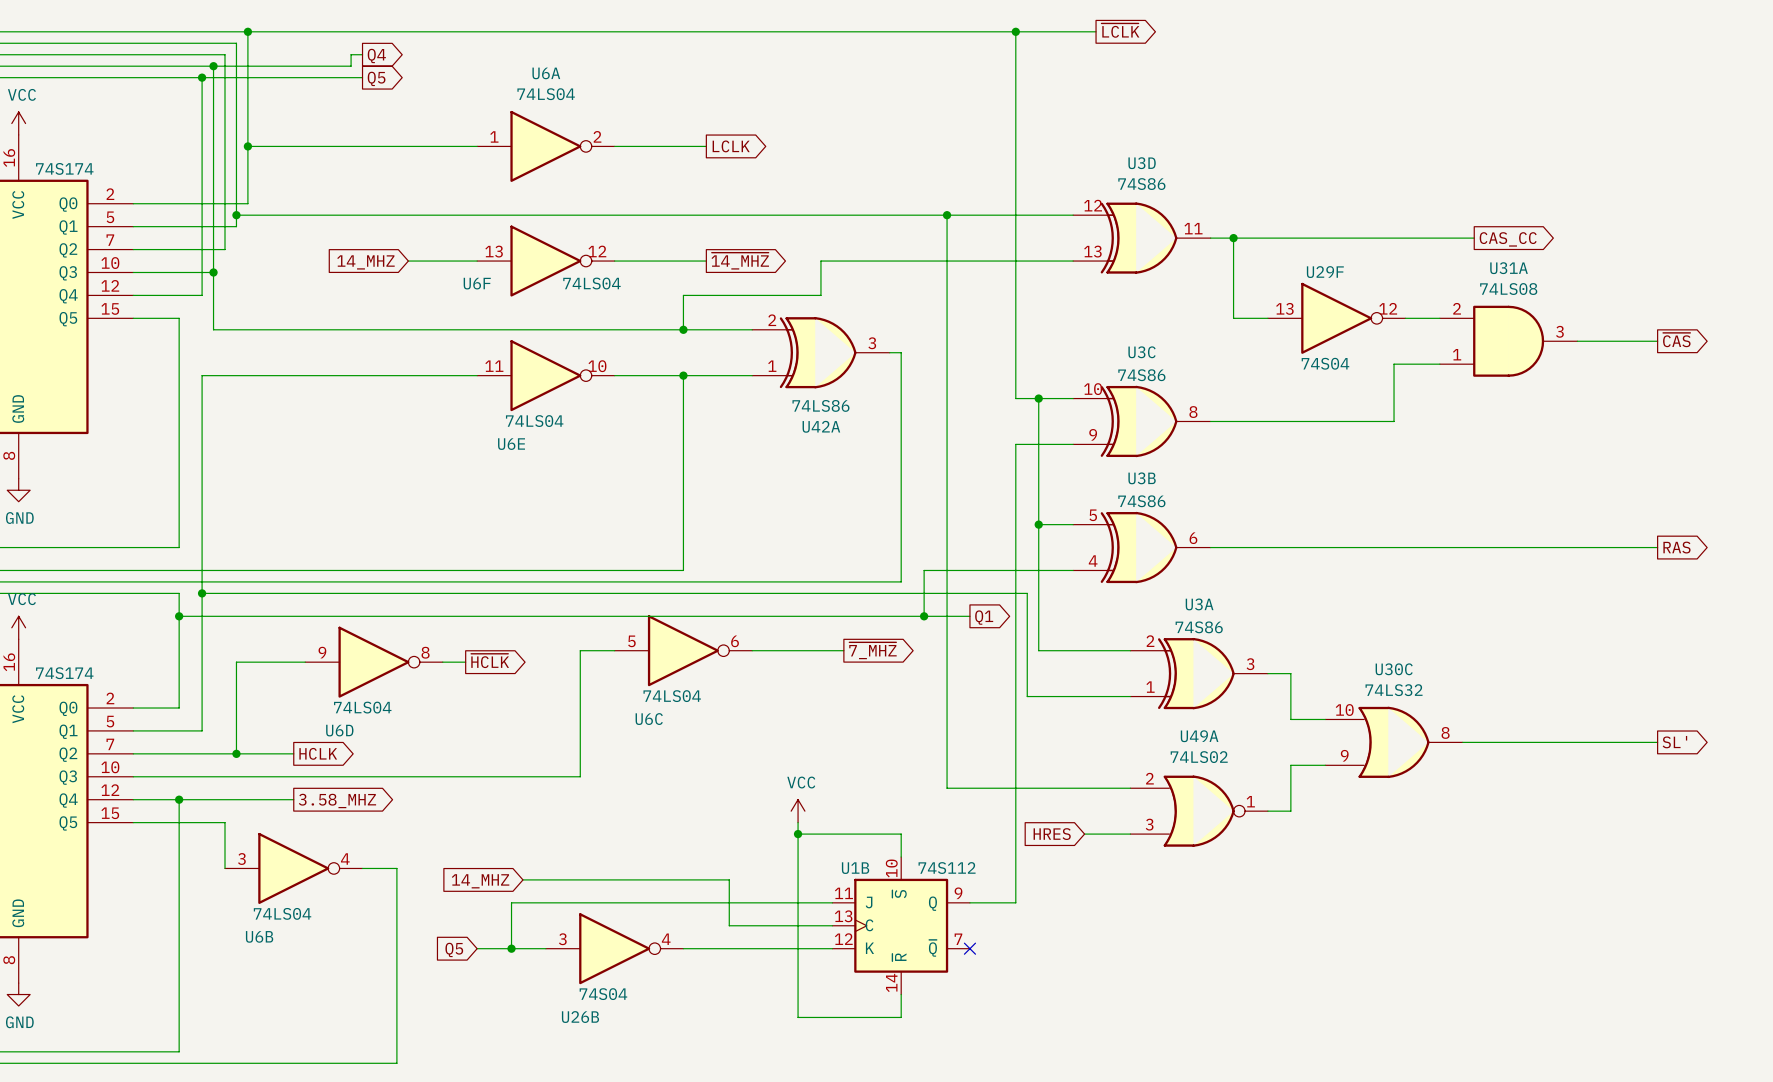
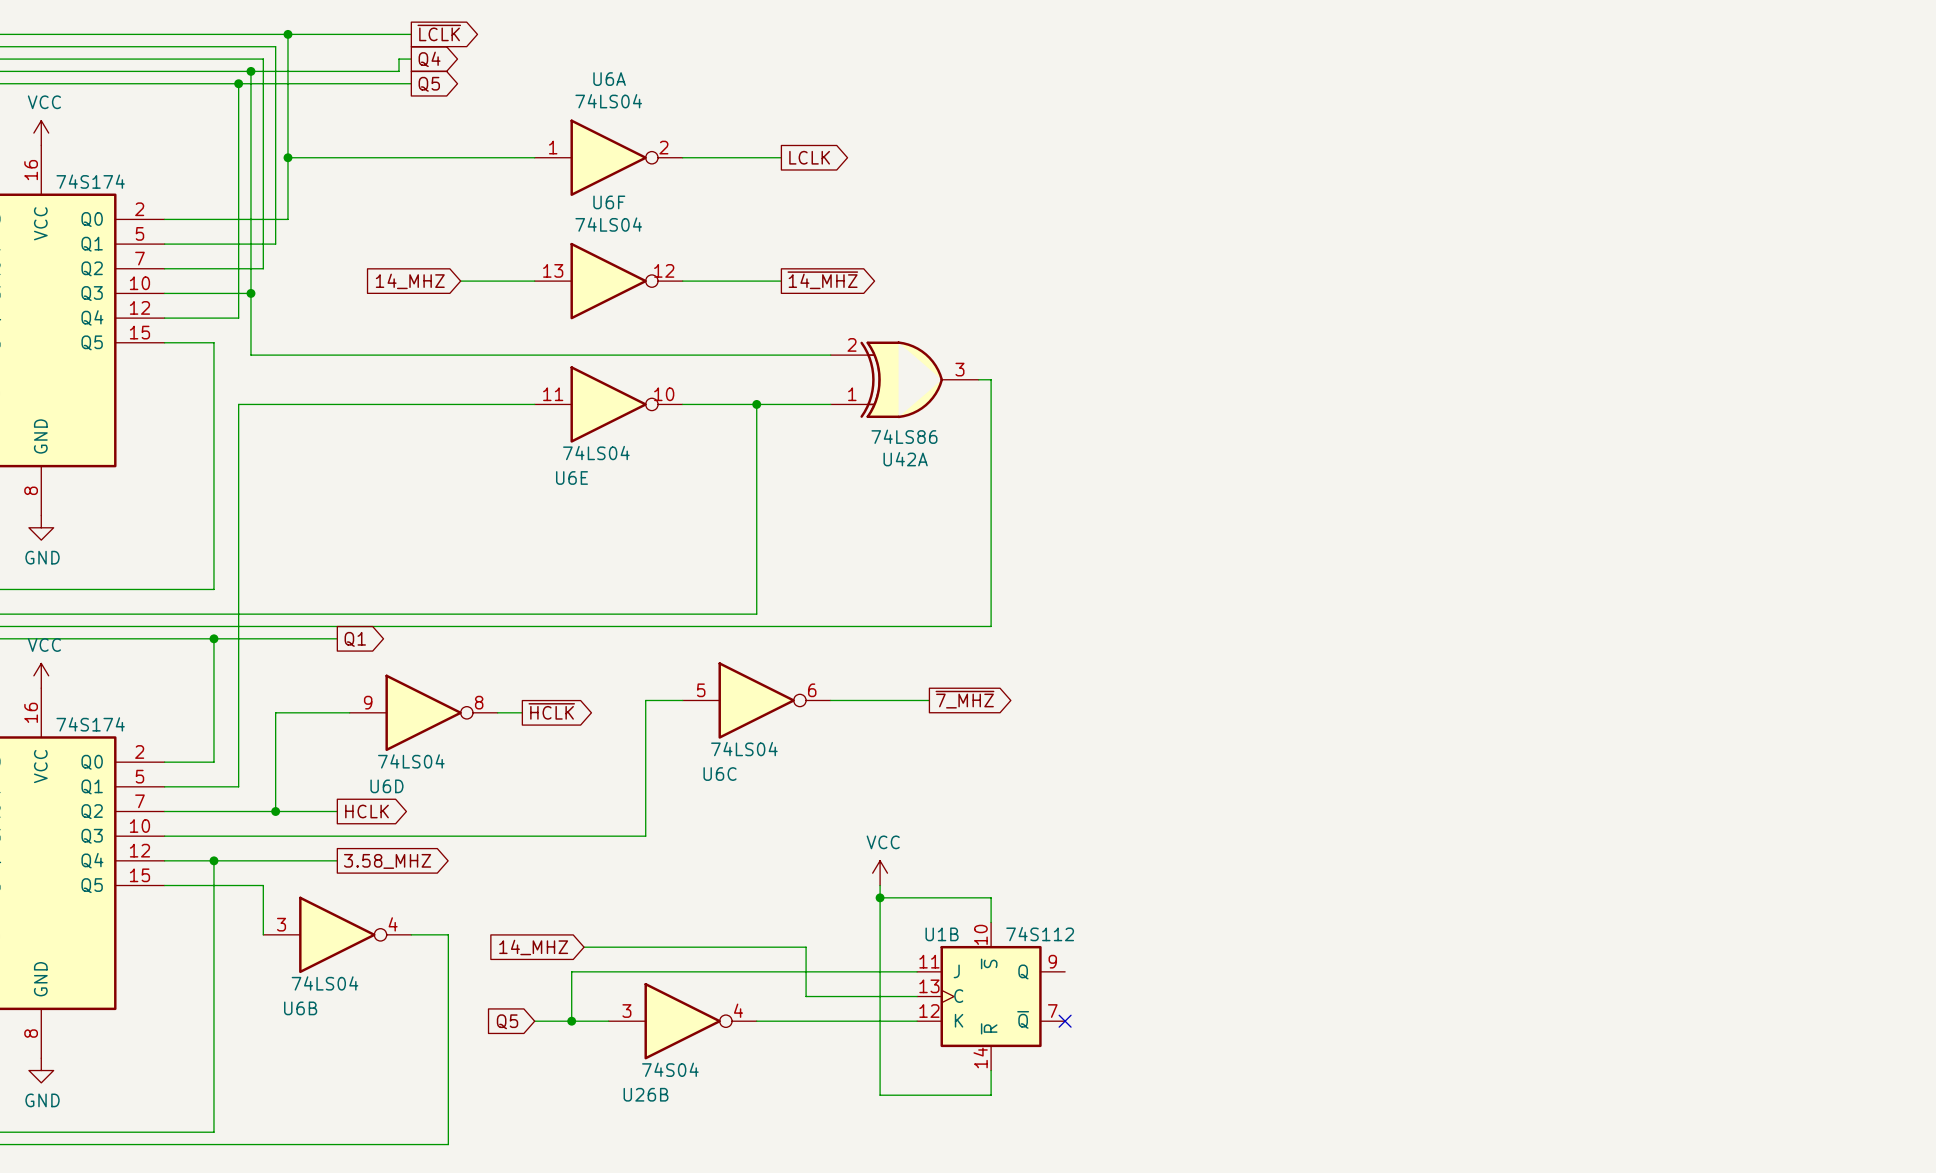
global label: none -> ~{LCLK} (439, 32)
global label: ~{LCLK} (1120, 30) -> none
wire: (362, 31) (1096, 31) -> none
wire: (1015, 31) (1015, 398) (1073, 398) -> none
junction: (1015, 31) -> none
wire: (236, 215) (1073, 215) -> none
junction: (236, 215) -> none
wire: (947, 215) (947, 788) (1130, 788) -> none
junction: (947, 215) -> none
U3D: 74S86 (1141, 238) -> none
wire: (1210, 238) (1474, 238) -> none
wire: (1233, 238) (1233, 318) (1267, 318) -> none
junction: (1233, 238) -> none
global label: CAS_CC (1508, 239) -> none
wire: (1073, 261) (820, 261) (820, 295) (683, 295) (683, 329) -> none
U6F name position: U6F (477, 283) -> U6F (609, 202)
U6F value position: 74LS04 (591, 283) -> 74LS04 (608, 224)
U29F: 74S04 (1336, 318) -> none
wire: (1405, 318) (1439, 318) -> none
junction: (683, 329) -> none
global label: ~{CAS} (1676, 340) -> none
U31A: 74LS08 (1508, 341) -> none
wire: (1577, 341) (1657, 341) -> none
wire: (1439, 364) (1394, 364) (1394, 421) (1210, 421) -> none
wire: (1038, 398) (1038, 650) (1130, 650) -> none
junction: (1038, 398) -> none
U3C: 74S86 (1141, 421) -> none
wire: (1073, 444) (1015, 444) (1015, 902) (969, 902) -> none
wire: (1038, 524) (1073, 524) -> none
junction: (1038, 524) -> none
U3B: 74S86 (1141, 547) -> none
wire: (1210, 547) (1657, 547) -> none
global label: RAS (1676, 547) -> none
wire: (1073, 570) (924, 570) (924, 616) -> none
wire: none -> (213, 638) (238, 638)
junction: none -> (213, 638)
junction: (202, 593) -> none
wire: (293, 593) (1027, 593) (1027, 696) (1130, 696) -> none
global label: none -> Q1 (355, 639)
wire: (179, 616) (969, 616) -> none
junction: (179, 616) -> none
junction: (924, 616) -> none
global label: Q1 (984, 617) -> none
U3A: 74S86 (1199, 673) -> none
wire: (1267, 673) (1290, 673) (1290, 719) (1325, 719) -> none
U30C: 74LS32 (1394, 742) -> none
wire: (1462, 742) (1657, 742) -> none
global label: SL' (1674, 742) -> none
wire: (1325, 765) (1290, 765) (1290, 811) (1267, 811) -> none
U49A: 74LS02 (1199, 811) -> none
global label: HRES (1052, 834) -> none
wire: (1084, 834) (1130, 834) -> none

